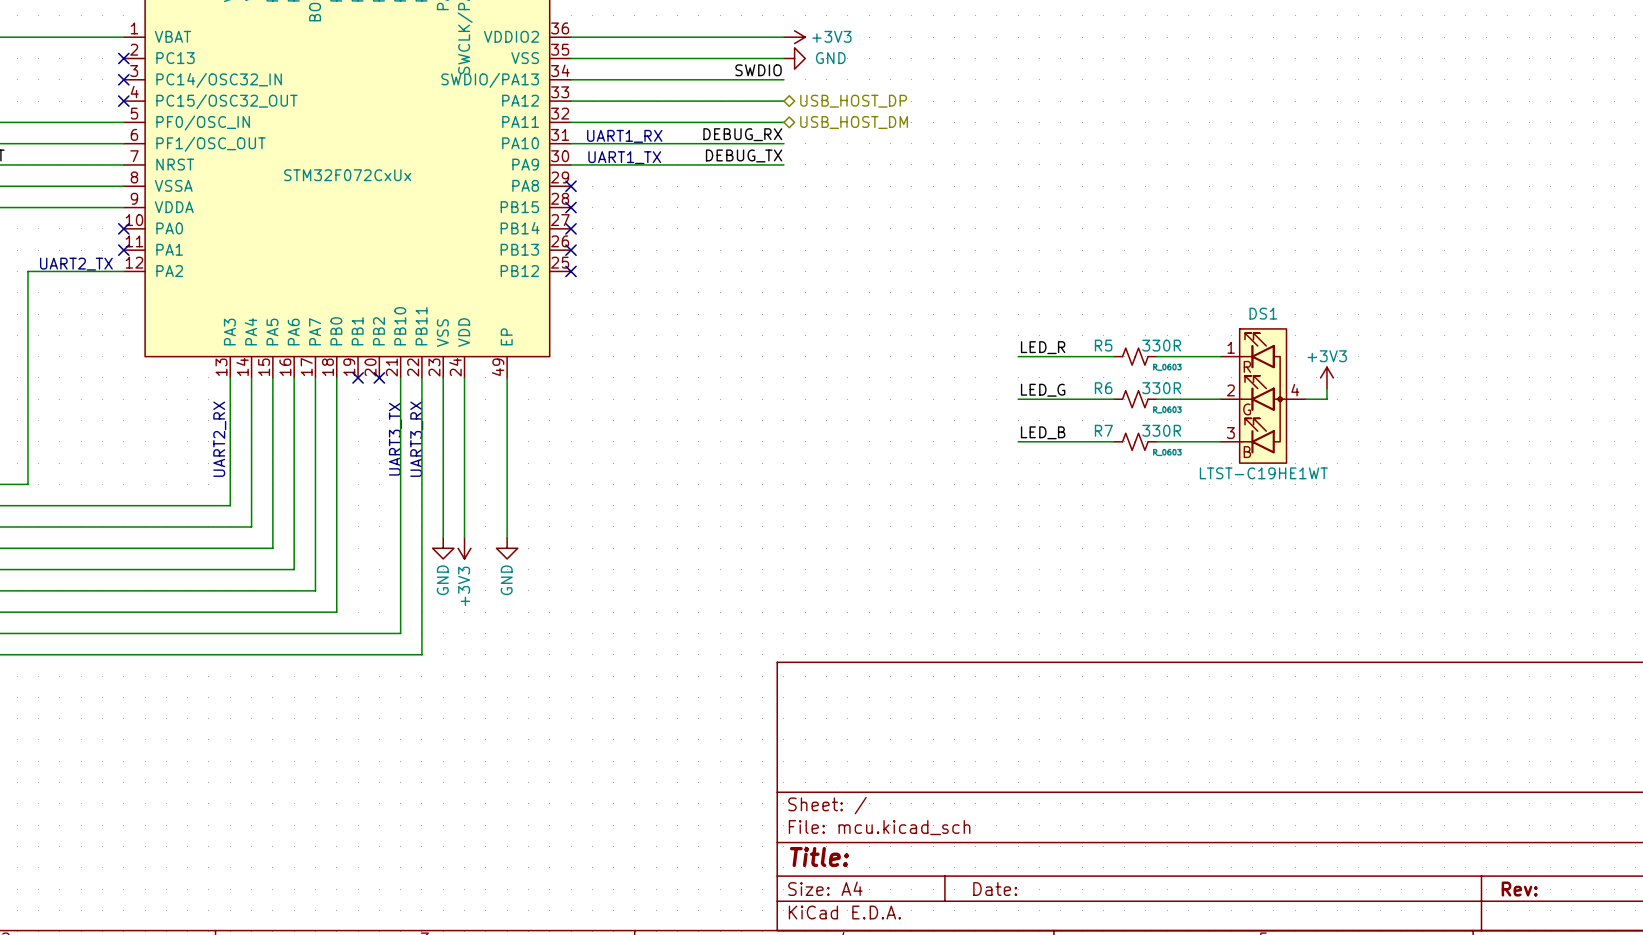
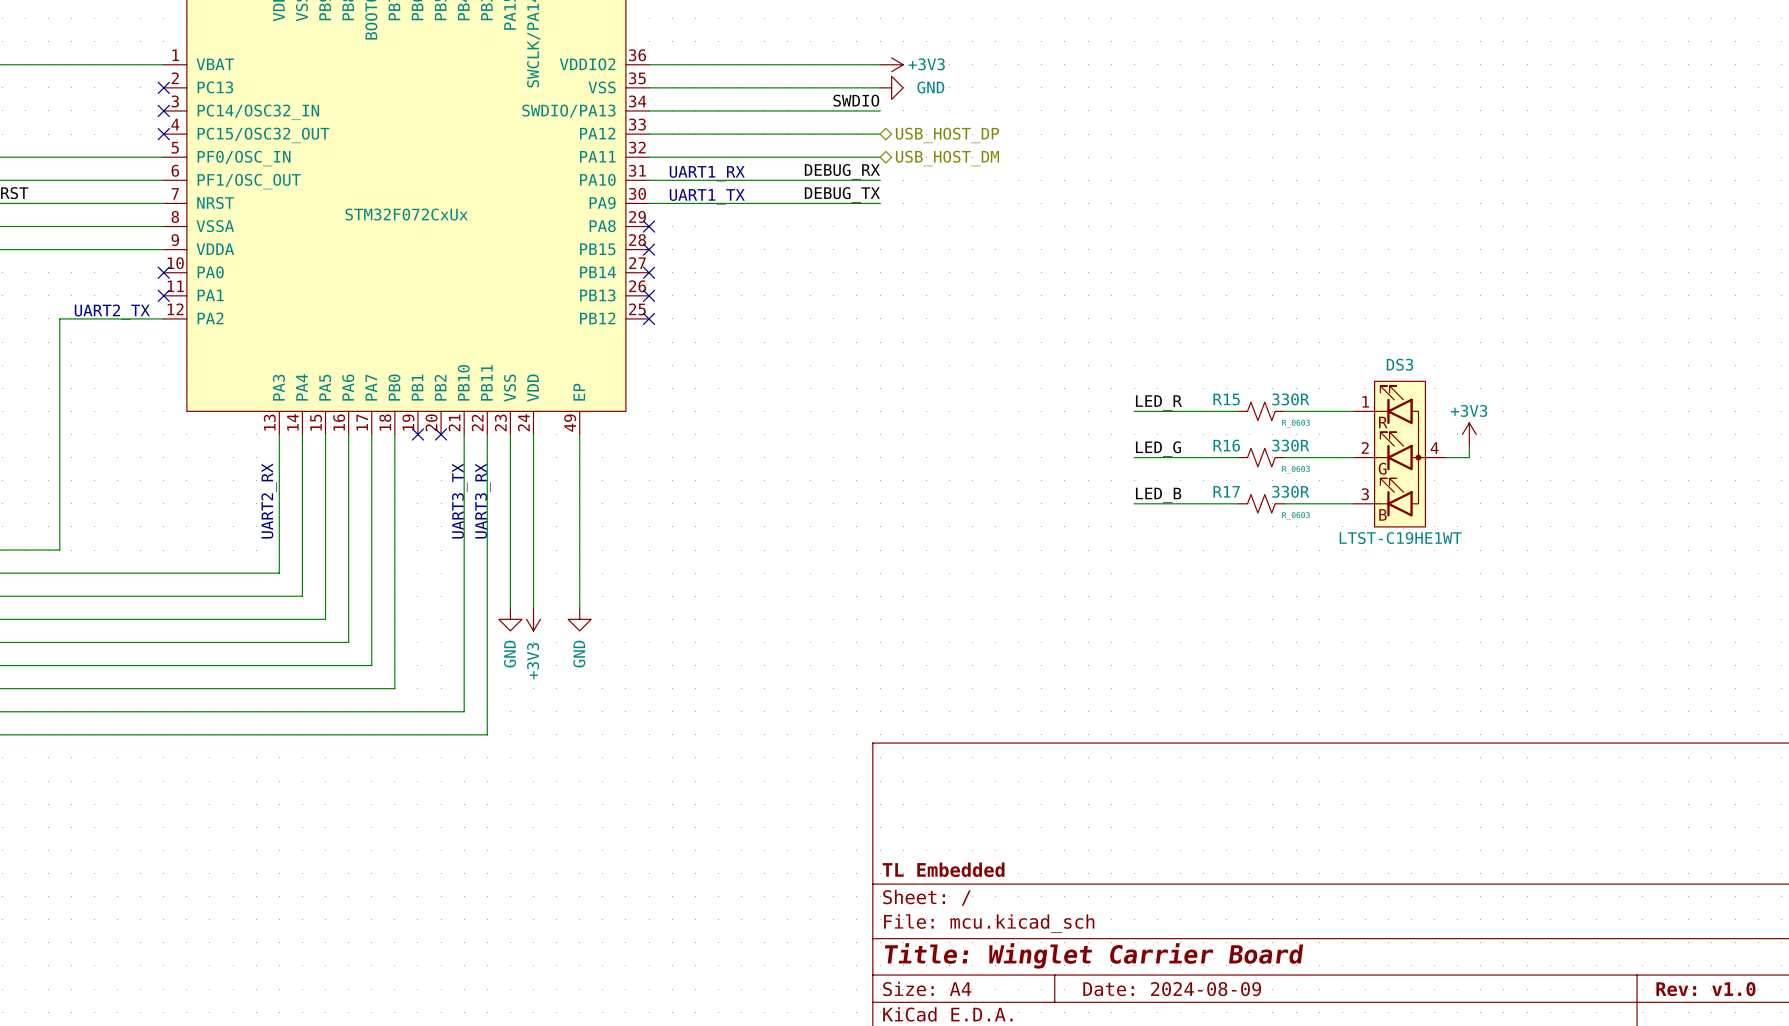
DS1 name: DS1 (1263, 313) -> DS3 (1399, 364)
R5 name: R5 (1103, 345) -> R15 (1226, 399)
R6 name: R6 (1103, 388) -> R16 (1226, 445)
R7 name: R7 (1103, 430) -> R17 (1226, 491)
title block: none -> TL Embedded (943, 869)
title block: Title: (819, 857) -> Title: Winglet Carrier Board (1094, 955)
title block: Date: (995, 889) -> Date: 2024-08-09 (1172, 989)
title block: Rev: (1519, 889) -> Rev: v1.0 (1705, 989)

